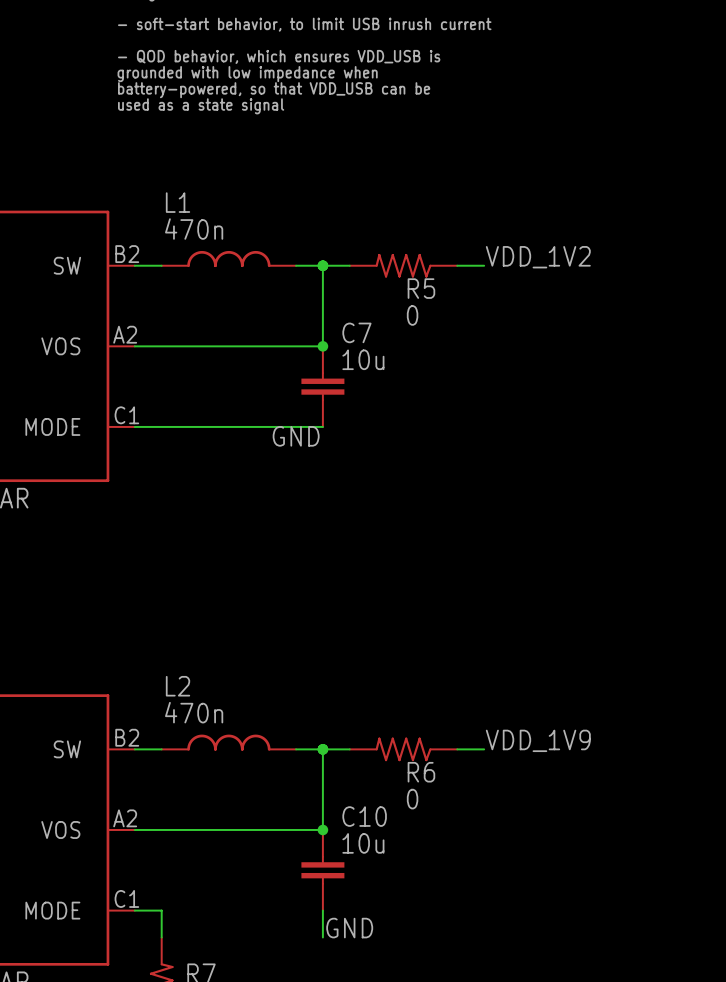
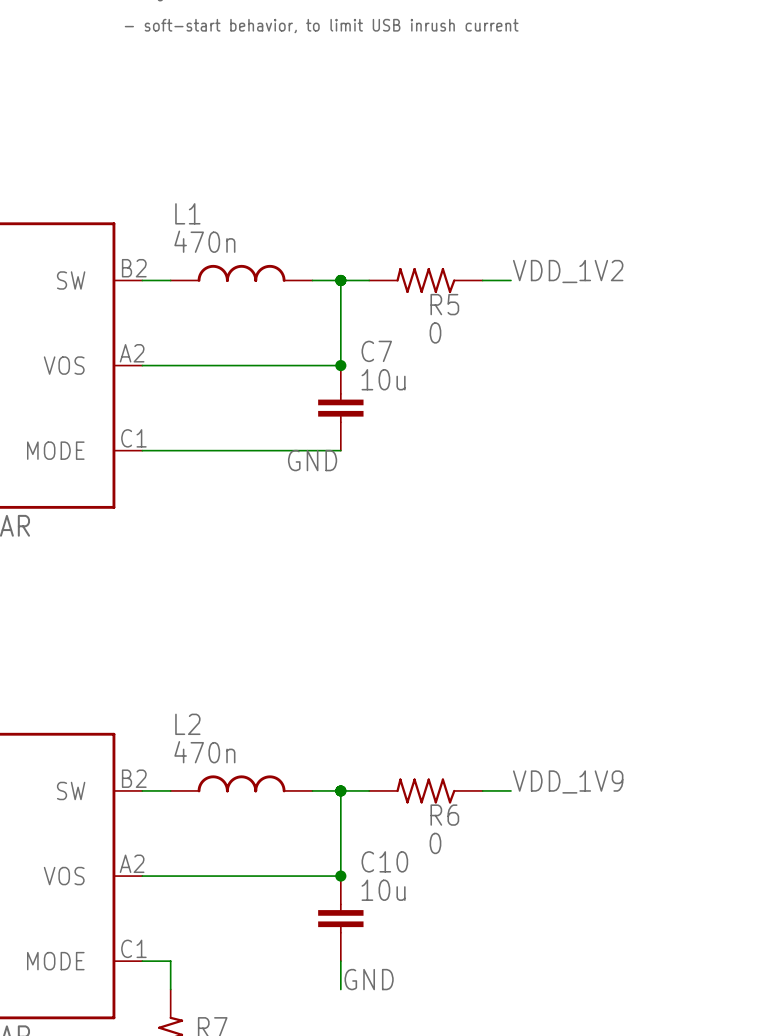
text: - QOD behavior, which ensures VDD_USB is (279, 56) -> none
text: grounded with low impedance when (247, 74) -> none
text: battery-powered, so that VDD_USB can be (274, 90) -> none
text: used as a state signal (201, 106) -> none

